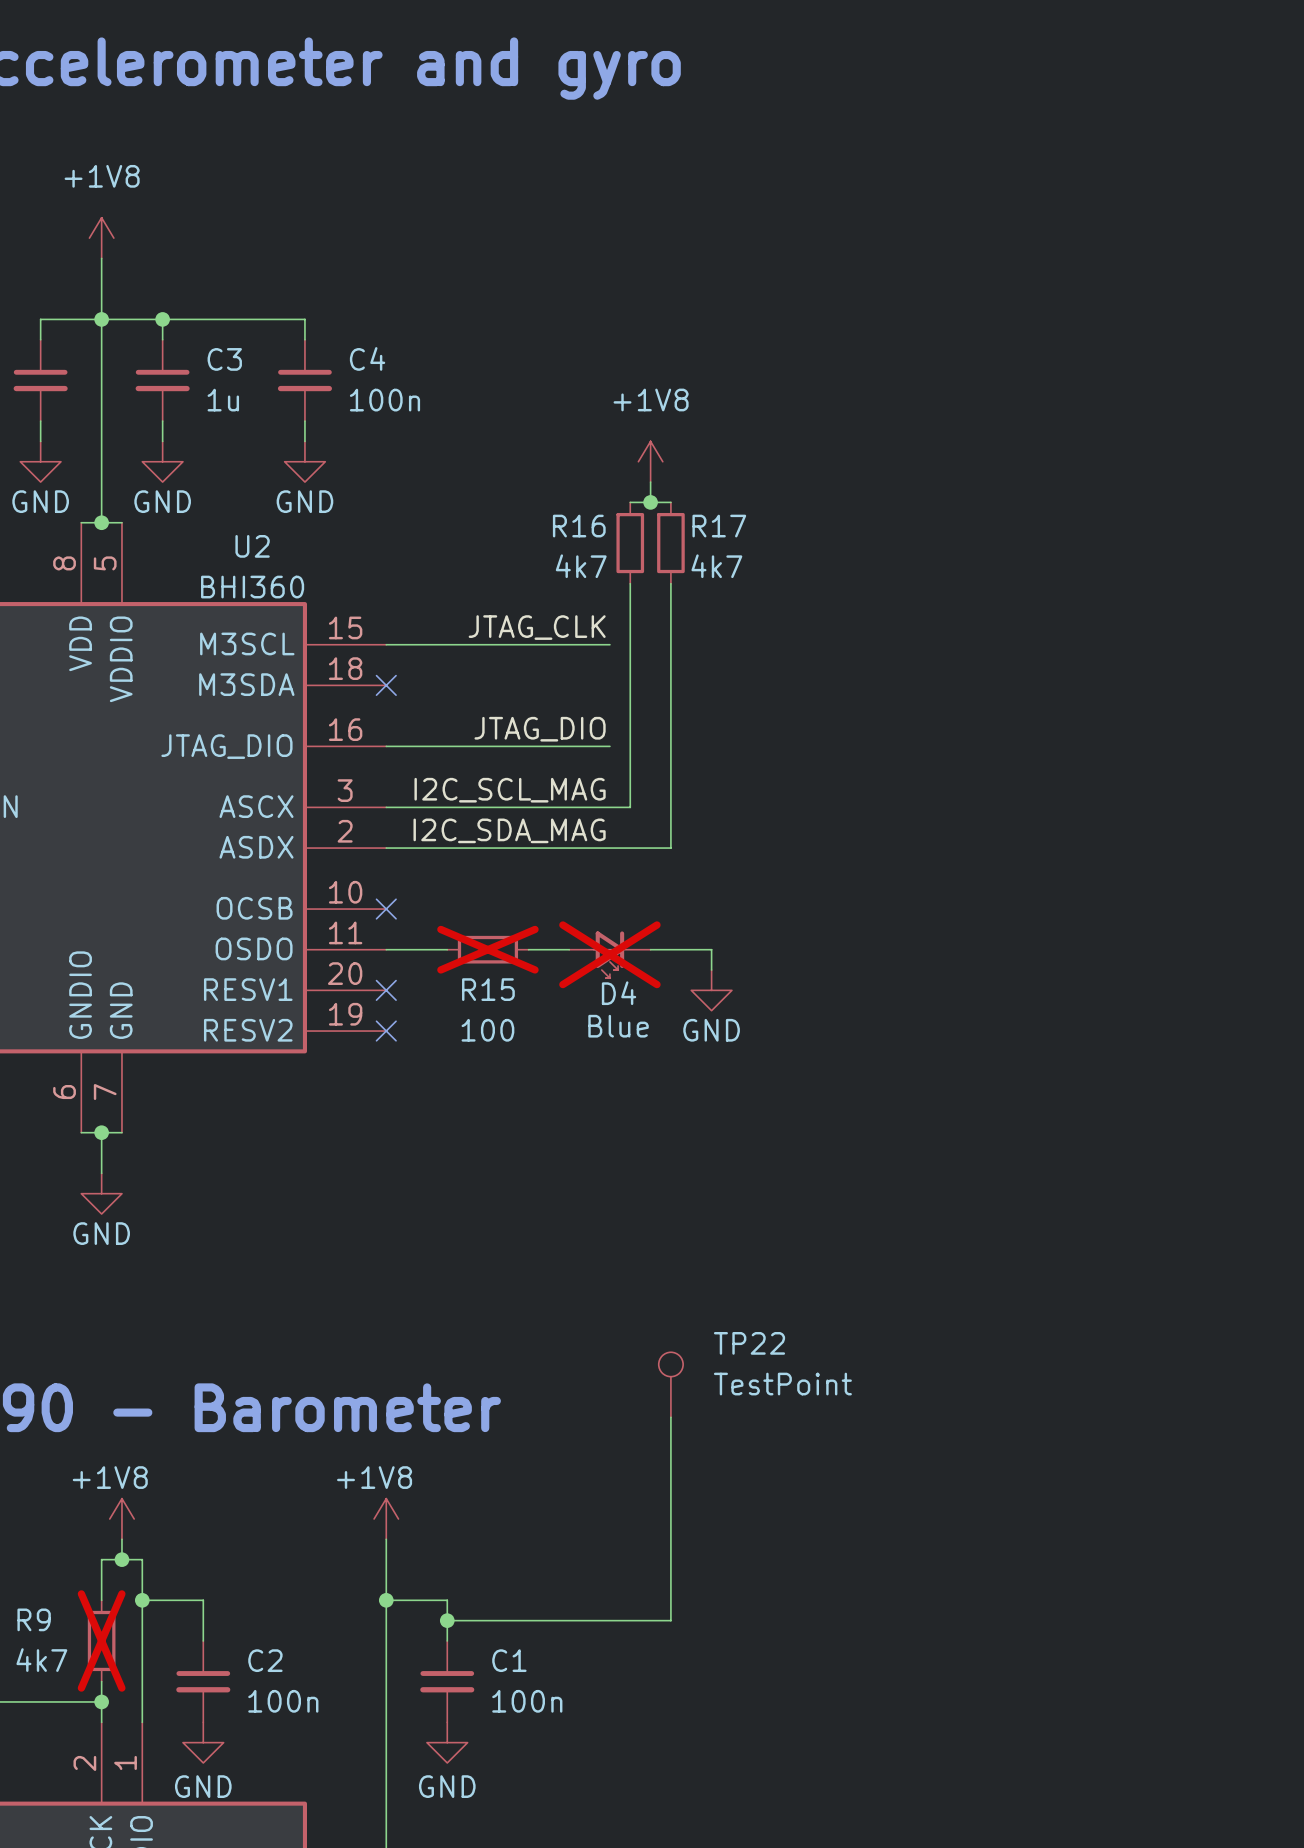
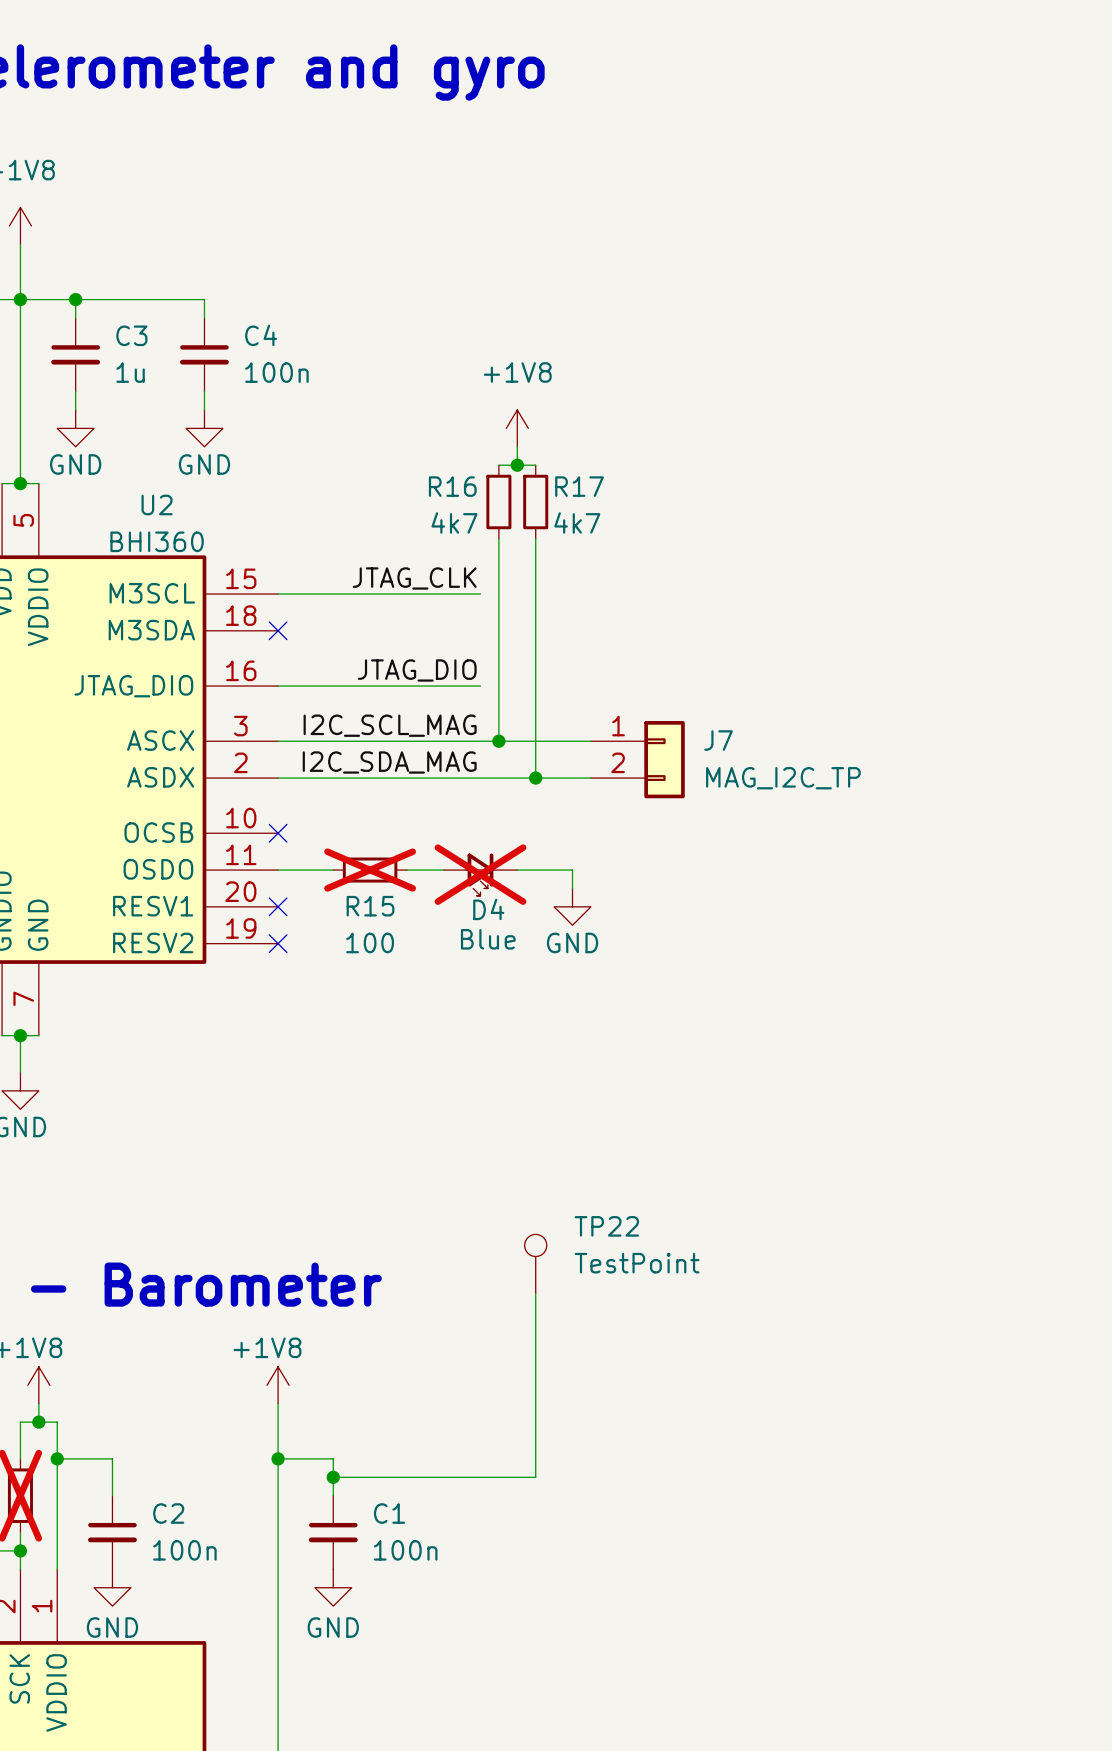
wire: none -> (498, 741) (590, 741)
junction: none -> (498, 741)
J7: none -> MAG_I2C_TP (637, 759)
wire: none -> (535, 778) (590, 778)
junction: none -> (535, 778)

